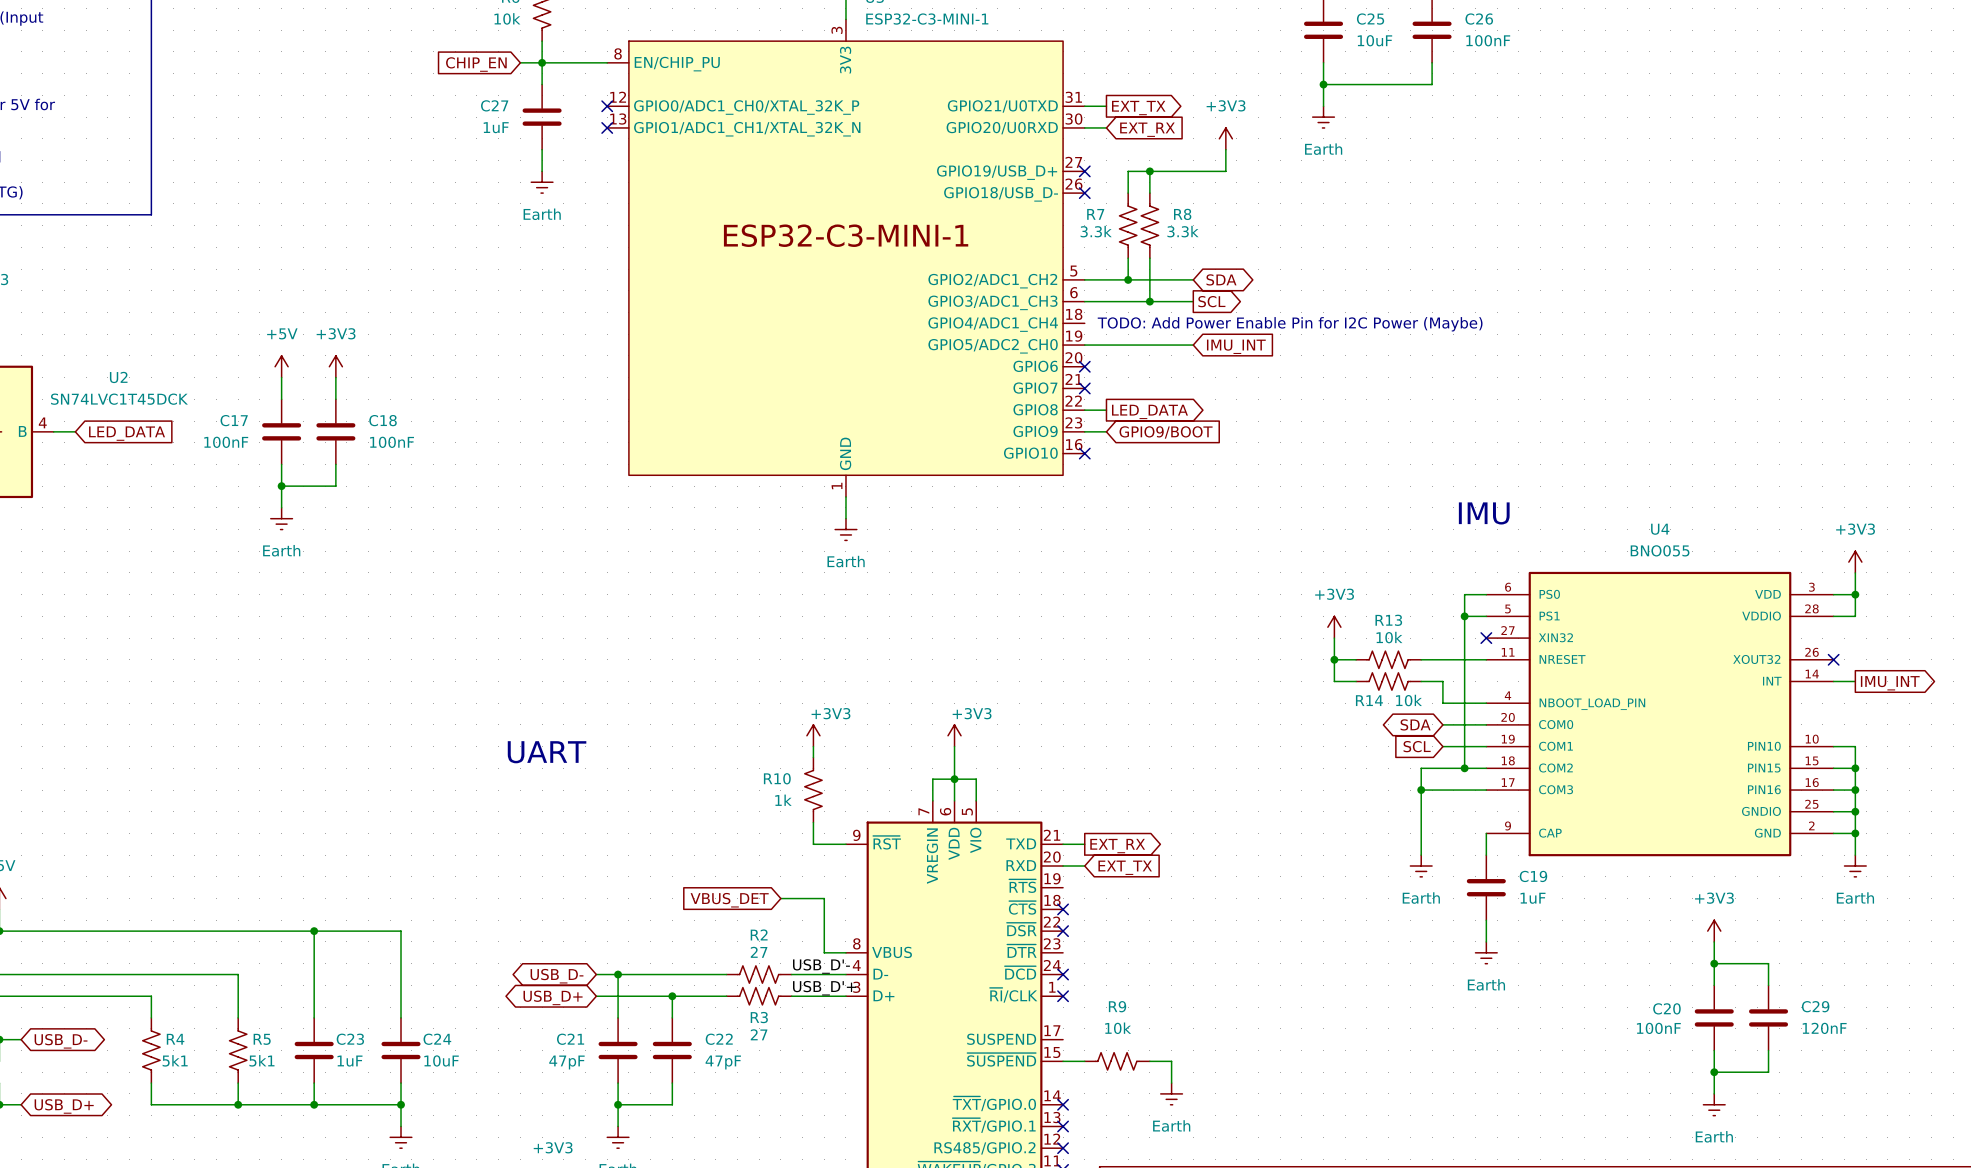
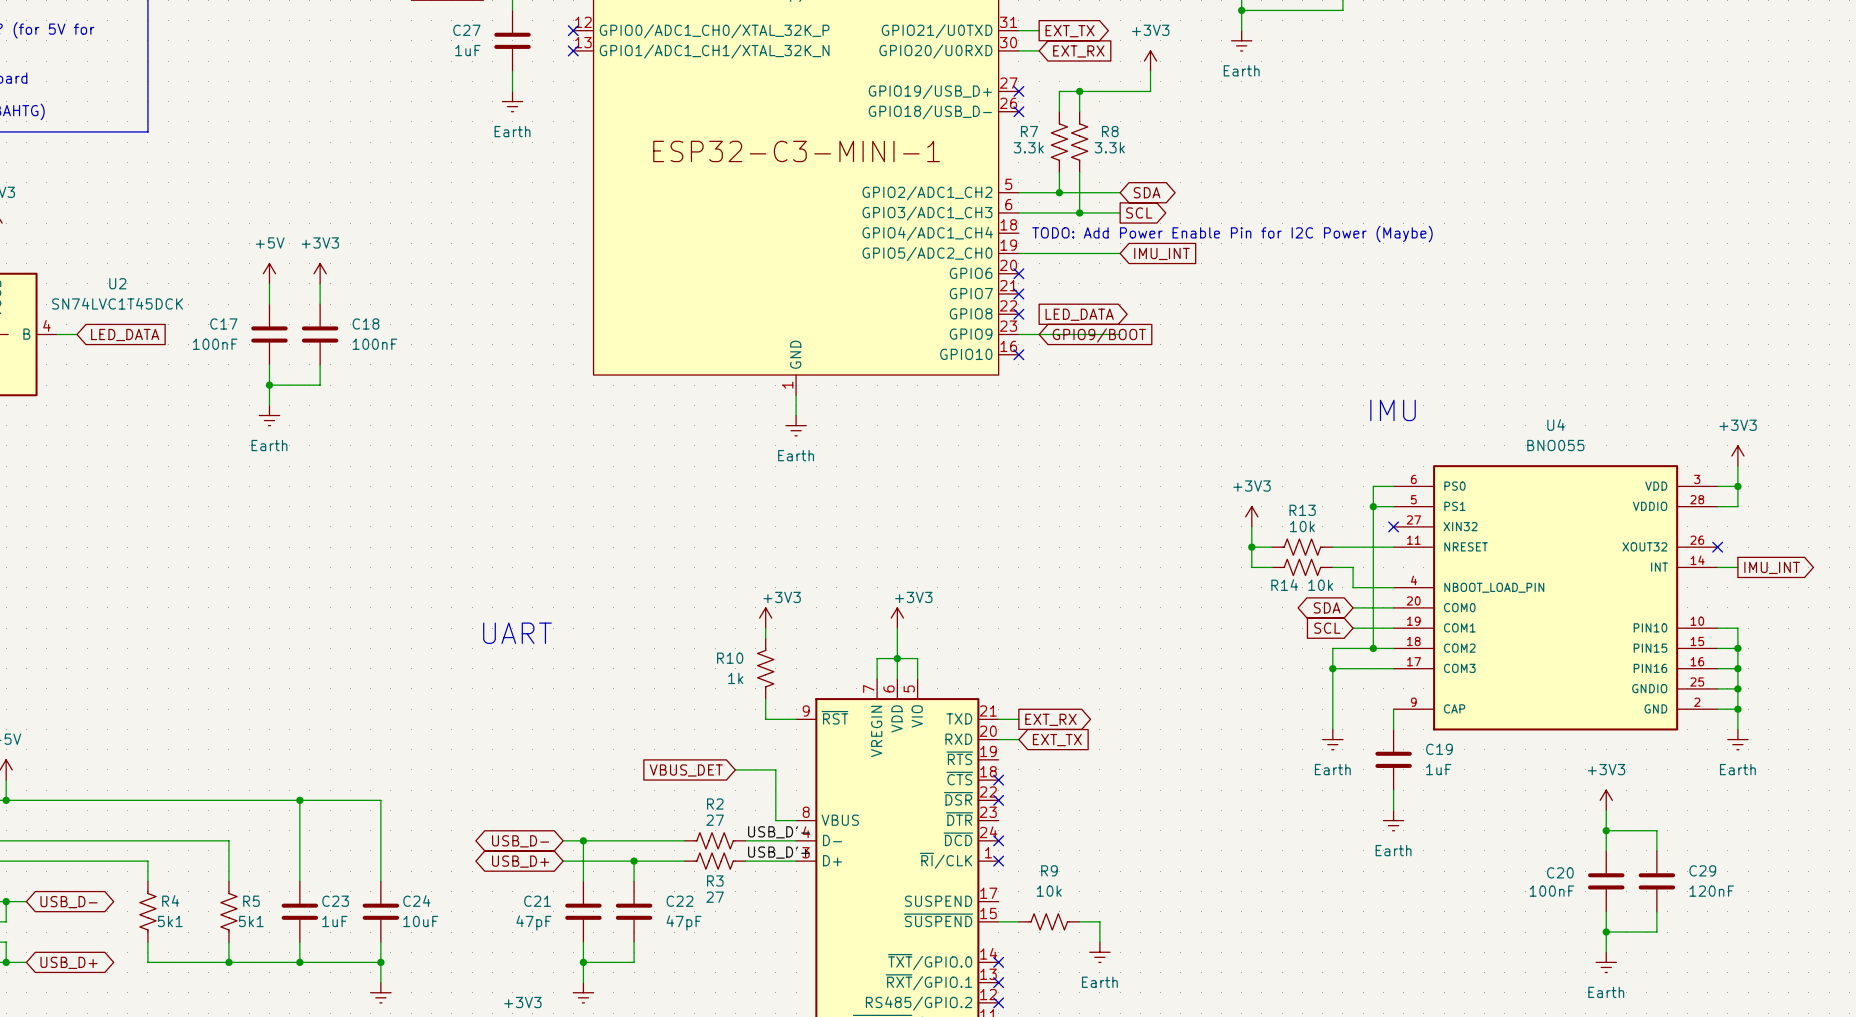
wire: (1084, 410) (1106, 410) -> none
no-connect mark: none -> (1018, 314)
wire: none -> (1039, 334) (1120, 334)

